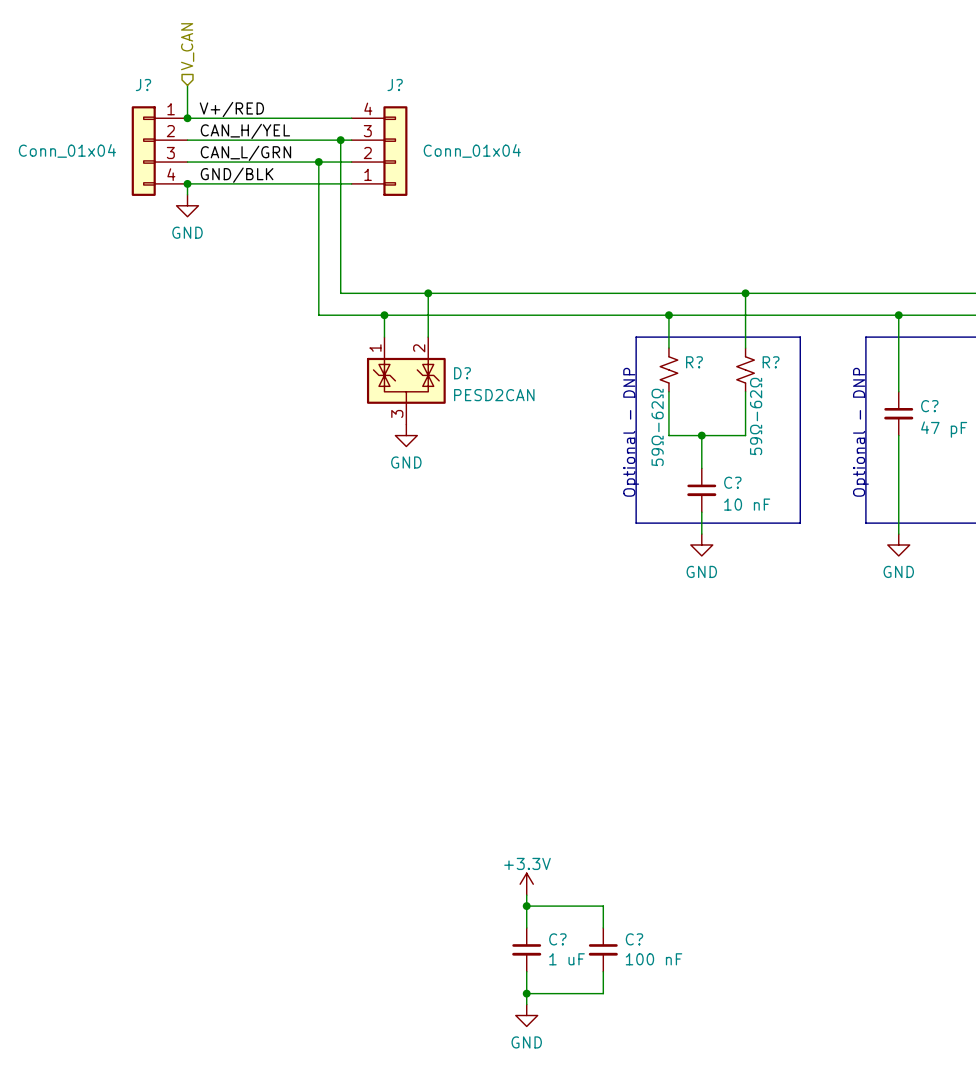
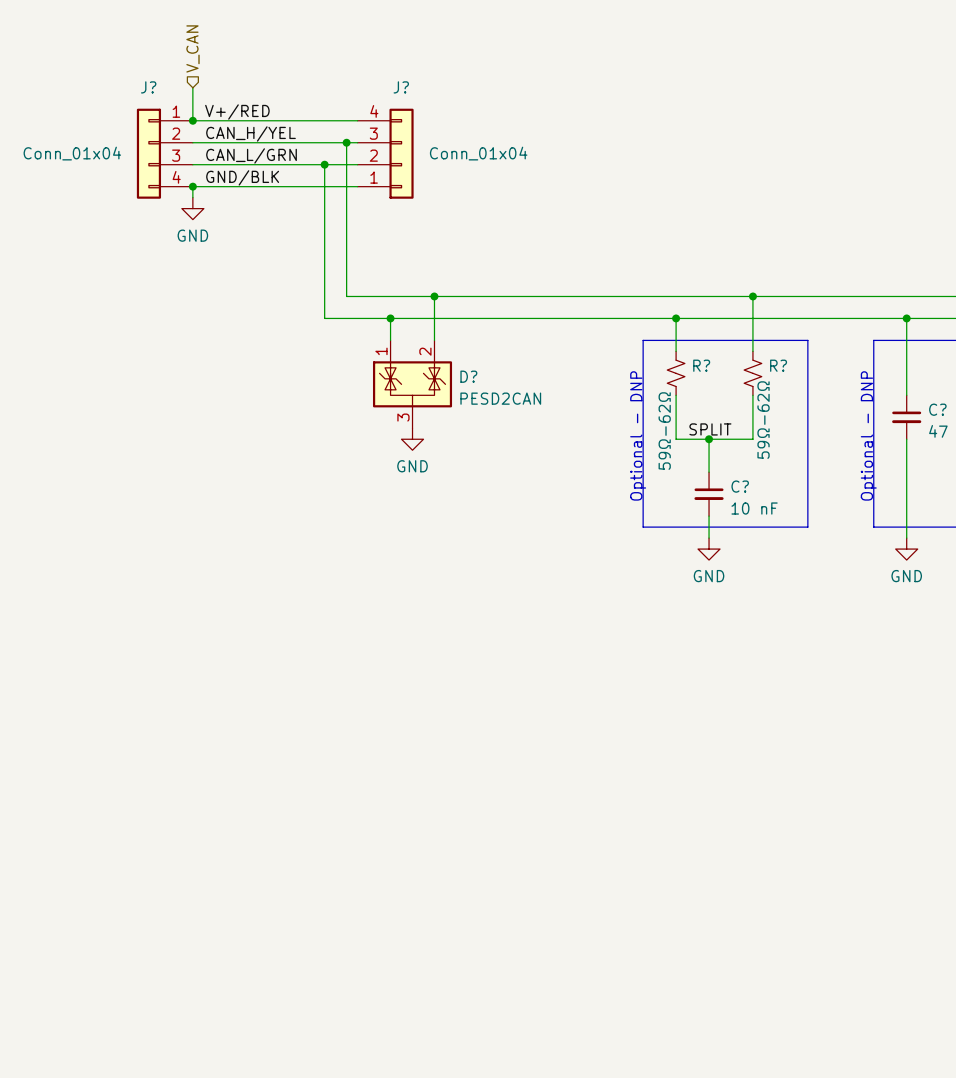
label: none -> SPLIT (710, 429)
power symbol: +3.3V (526, 884) -> none
wire: (526, 895) (526, 927) -> none
wire: (526, 906) (603, 906) (603, 927) -> none
junction: (526, 906) -> none
C?: 1 uF (526, 949) -> none
C?: 100 nF (603, 949) -> none
wire: (526, 971) (526, 1004) -> none
wire: (603, 971) (603, 993) (526, 993) -> none
junction: (526, 993) -> none
power symbol: GND (526, 1015) -> none

